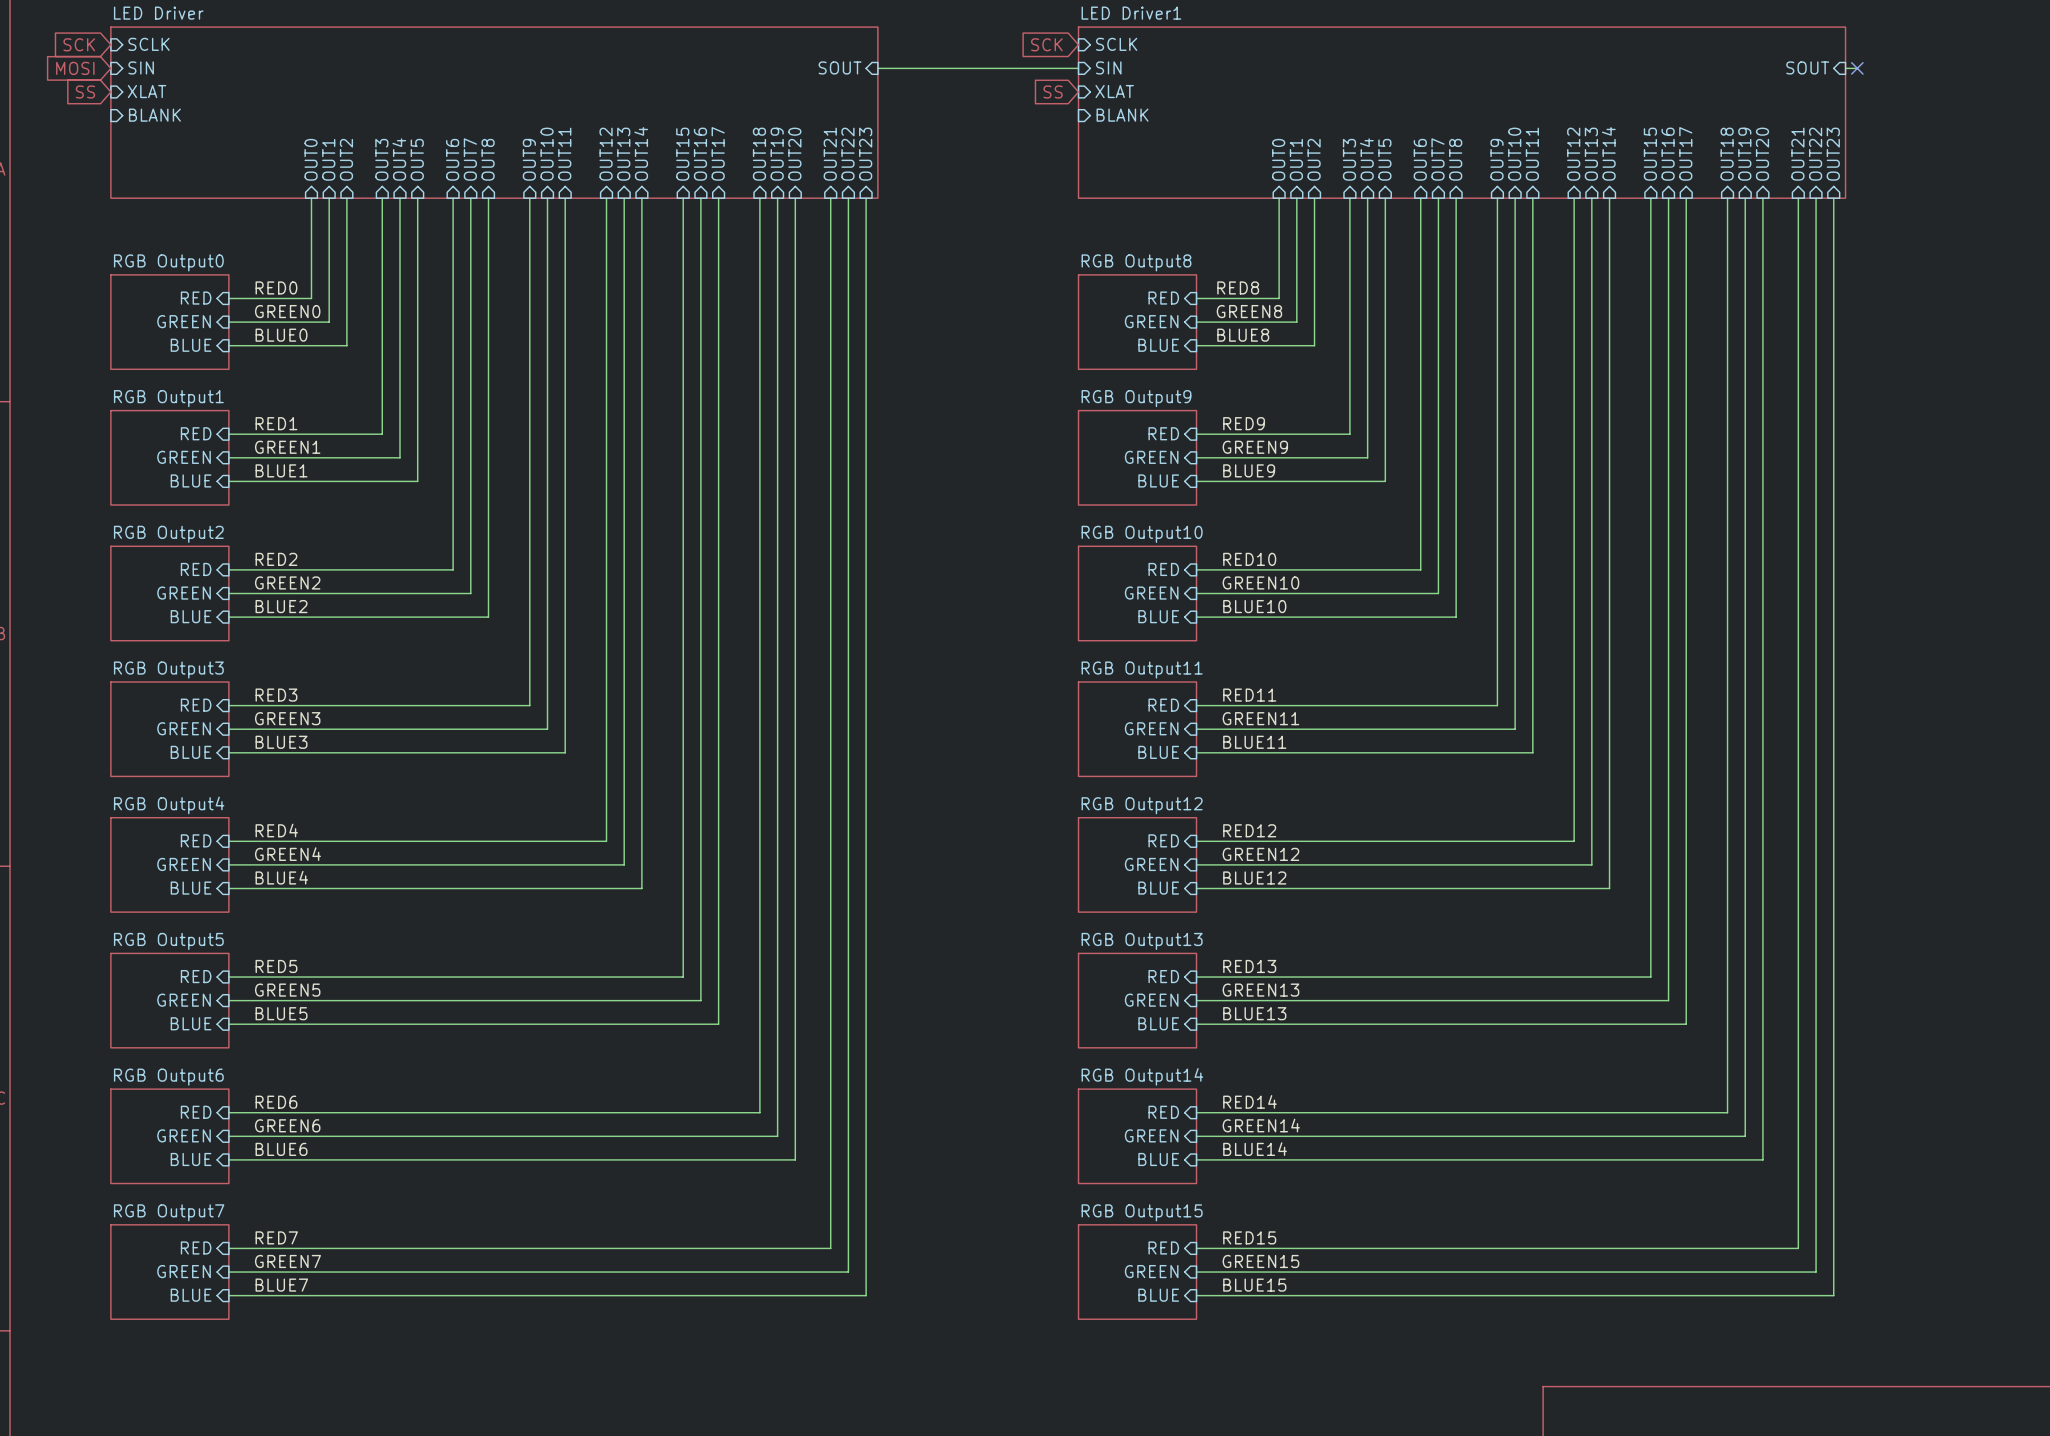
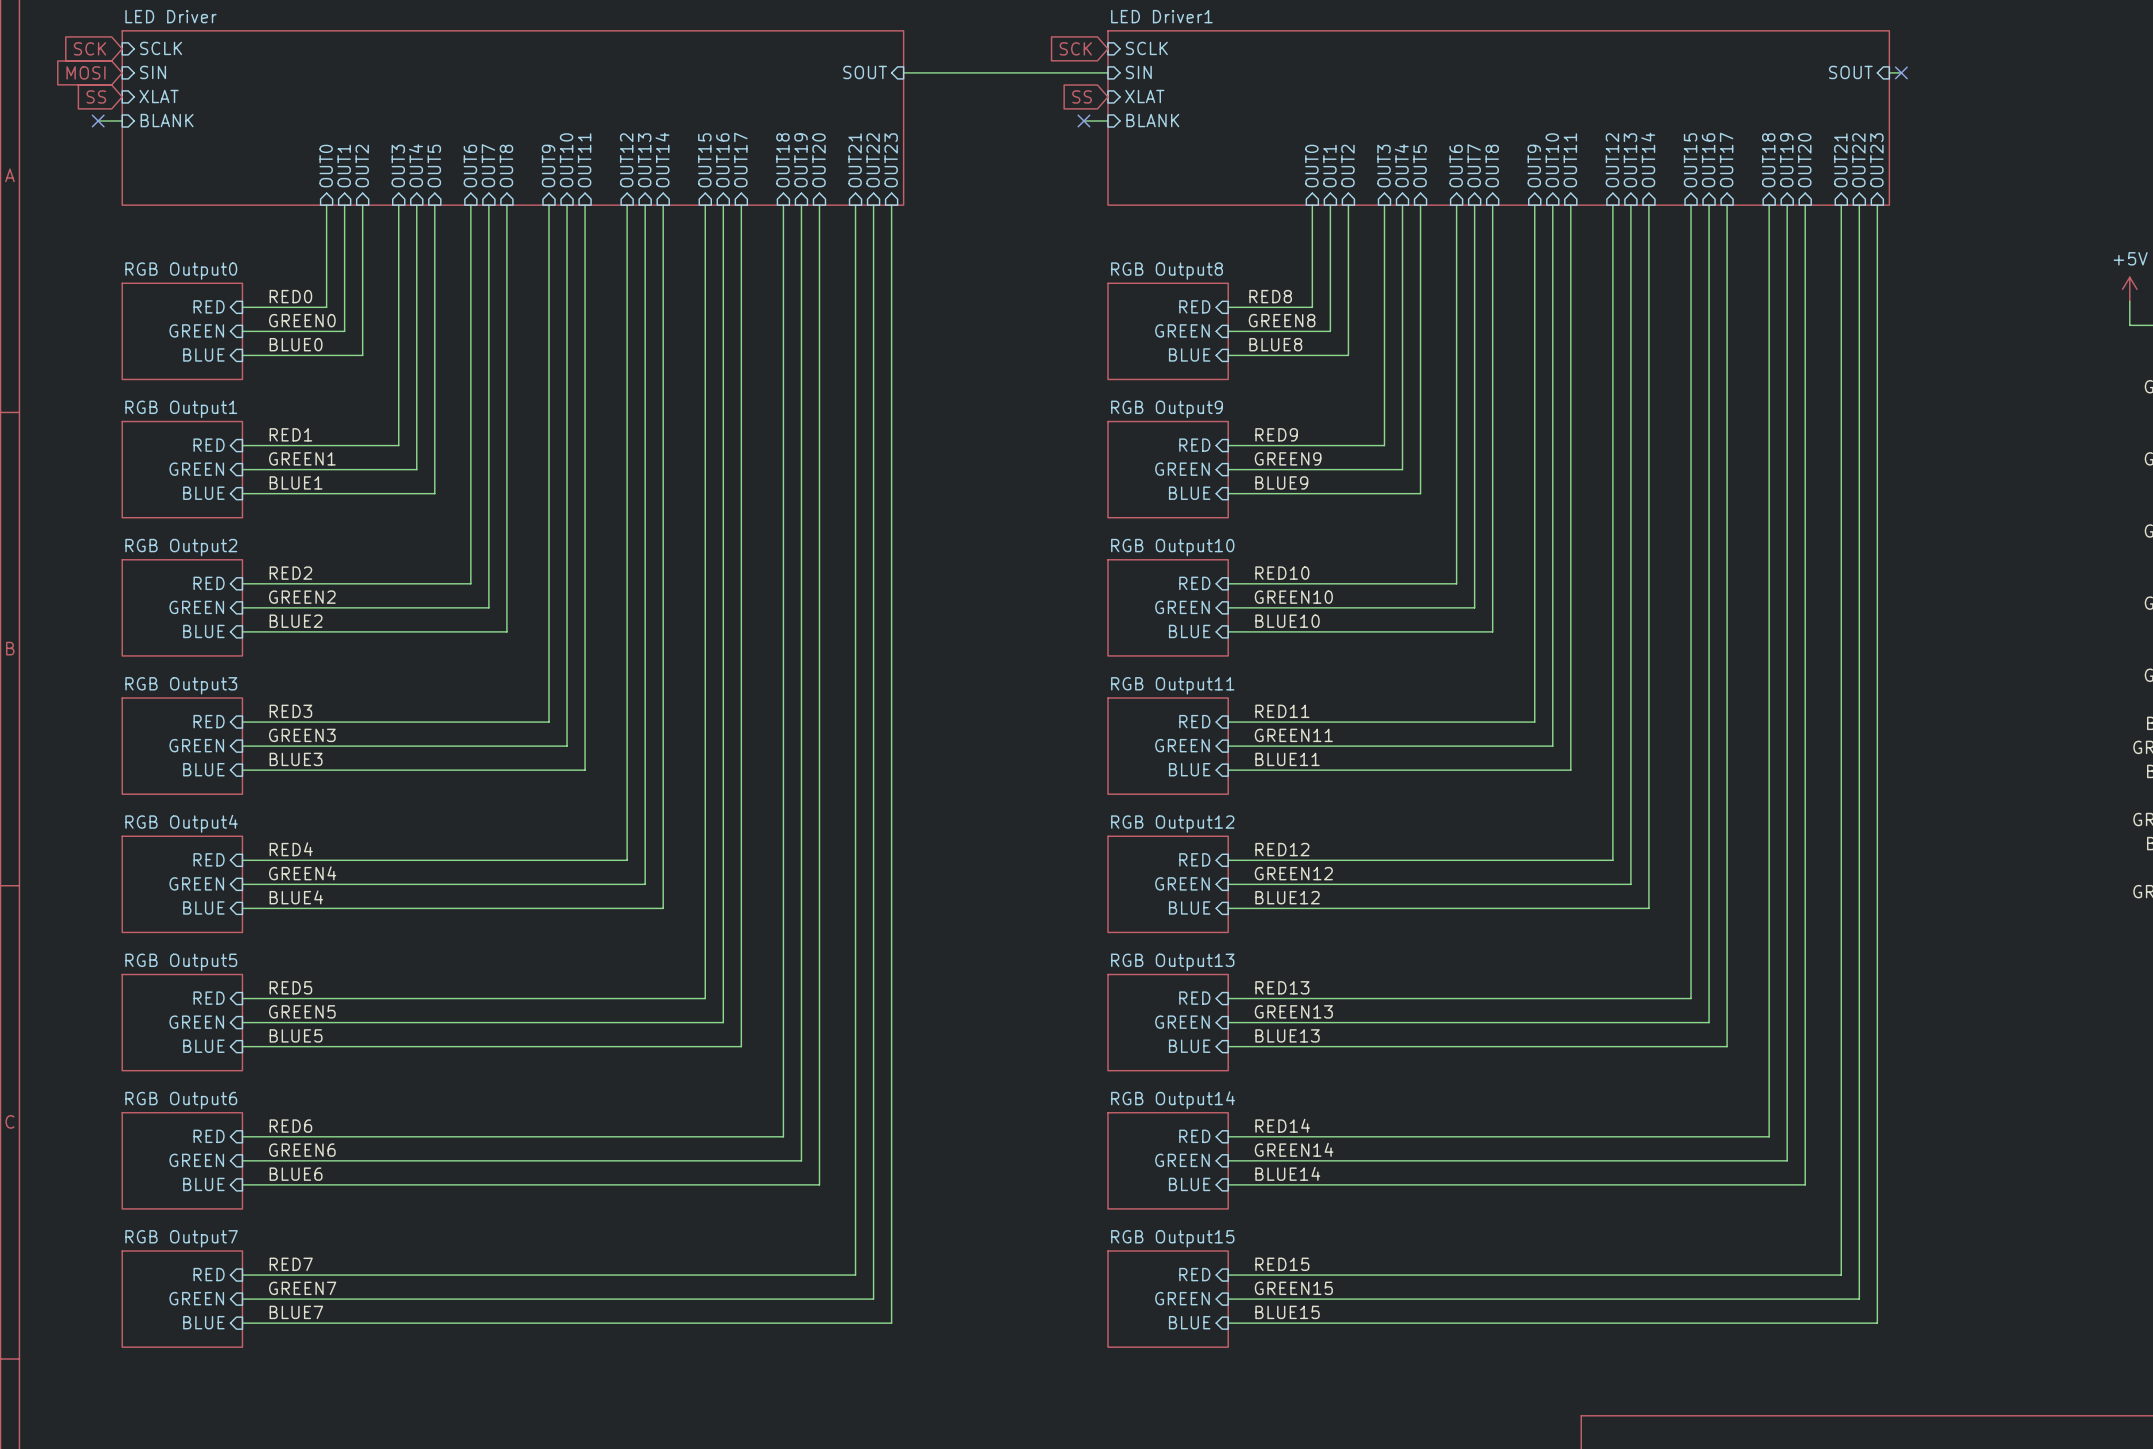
wire: none -> (98, 121) (122, 121)
no-connect mark: none -> (98, 121)
wire: none -> (1083, 121) (1107, 121)
no-connect mark: none -> (1083, 121)

